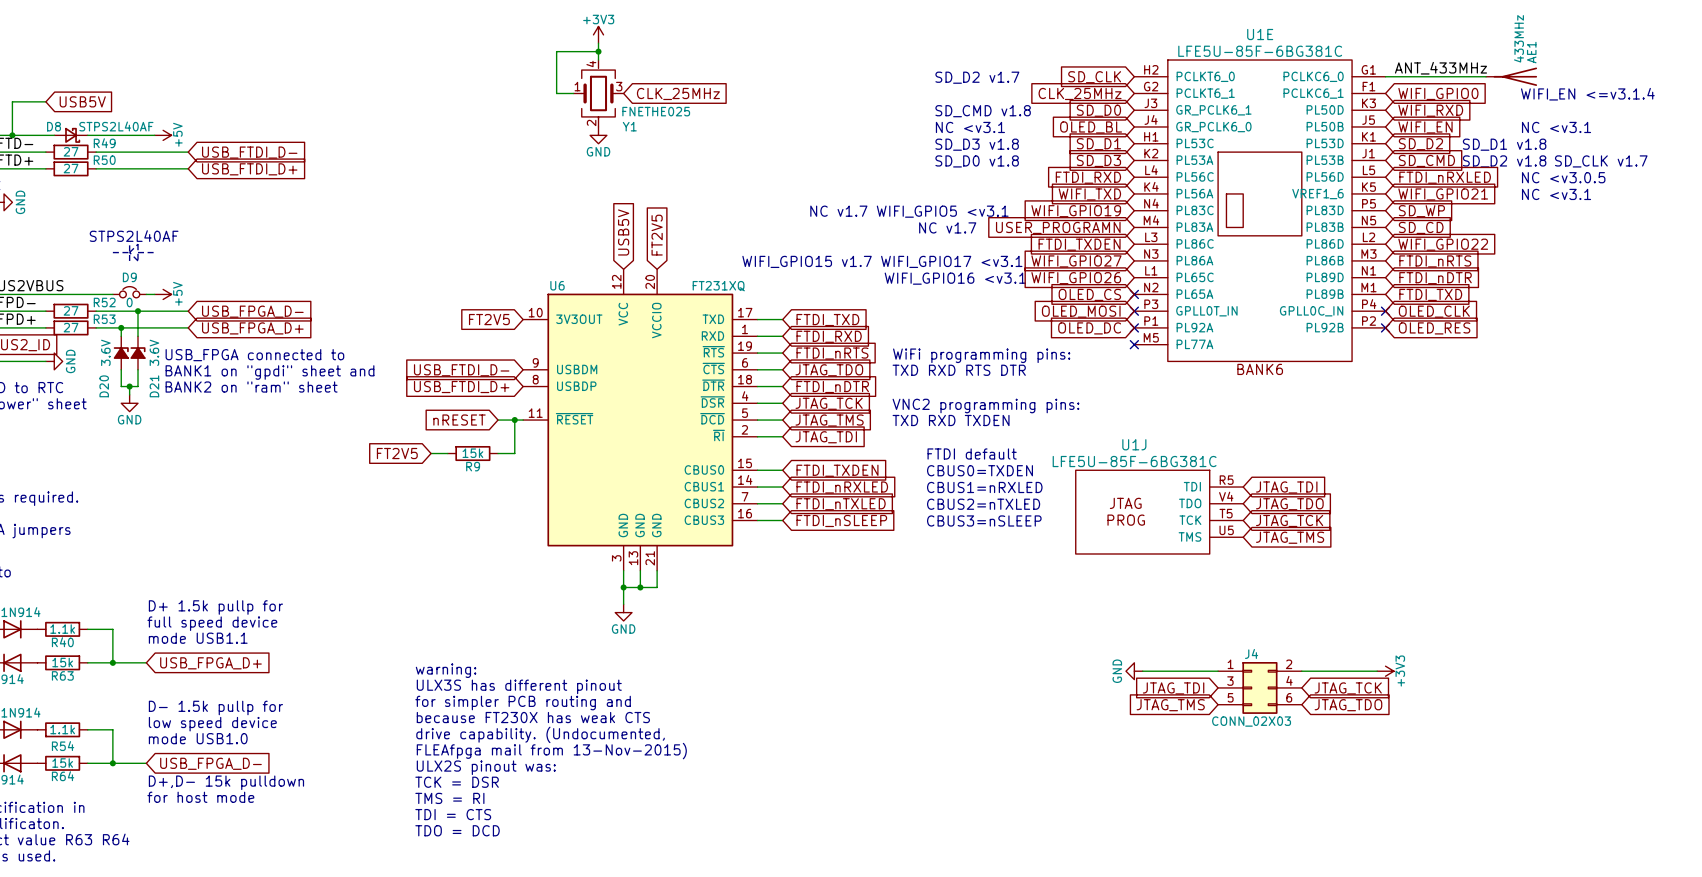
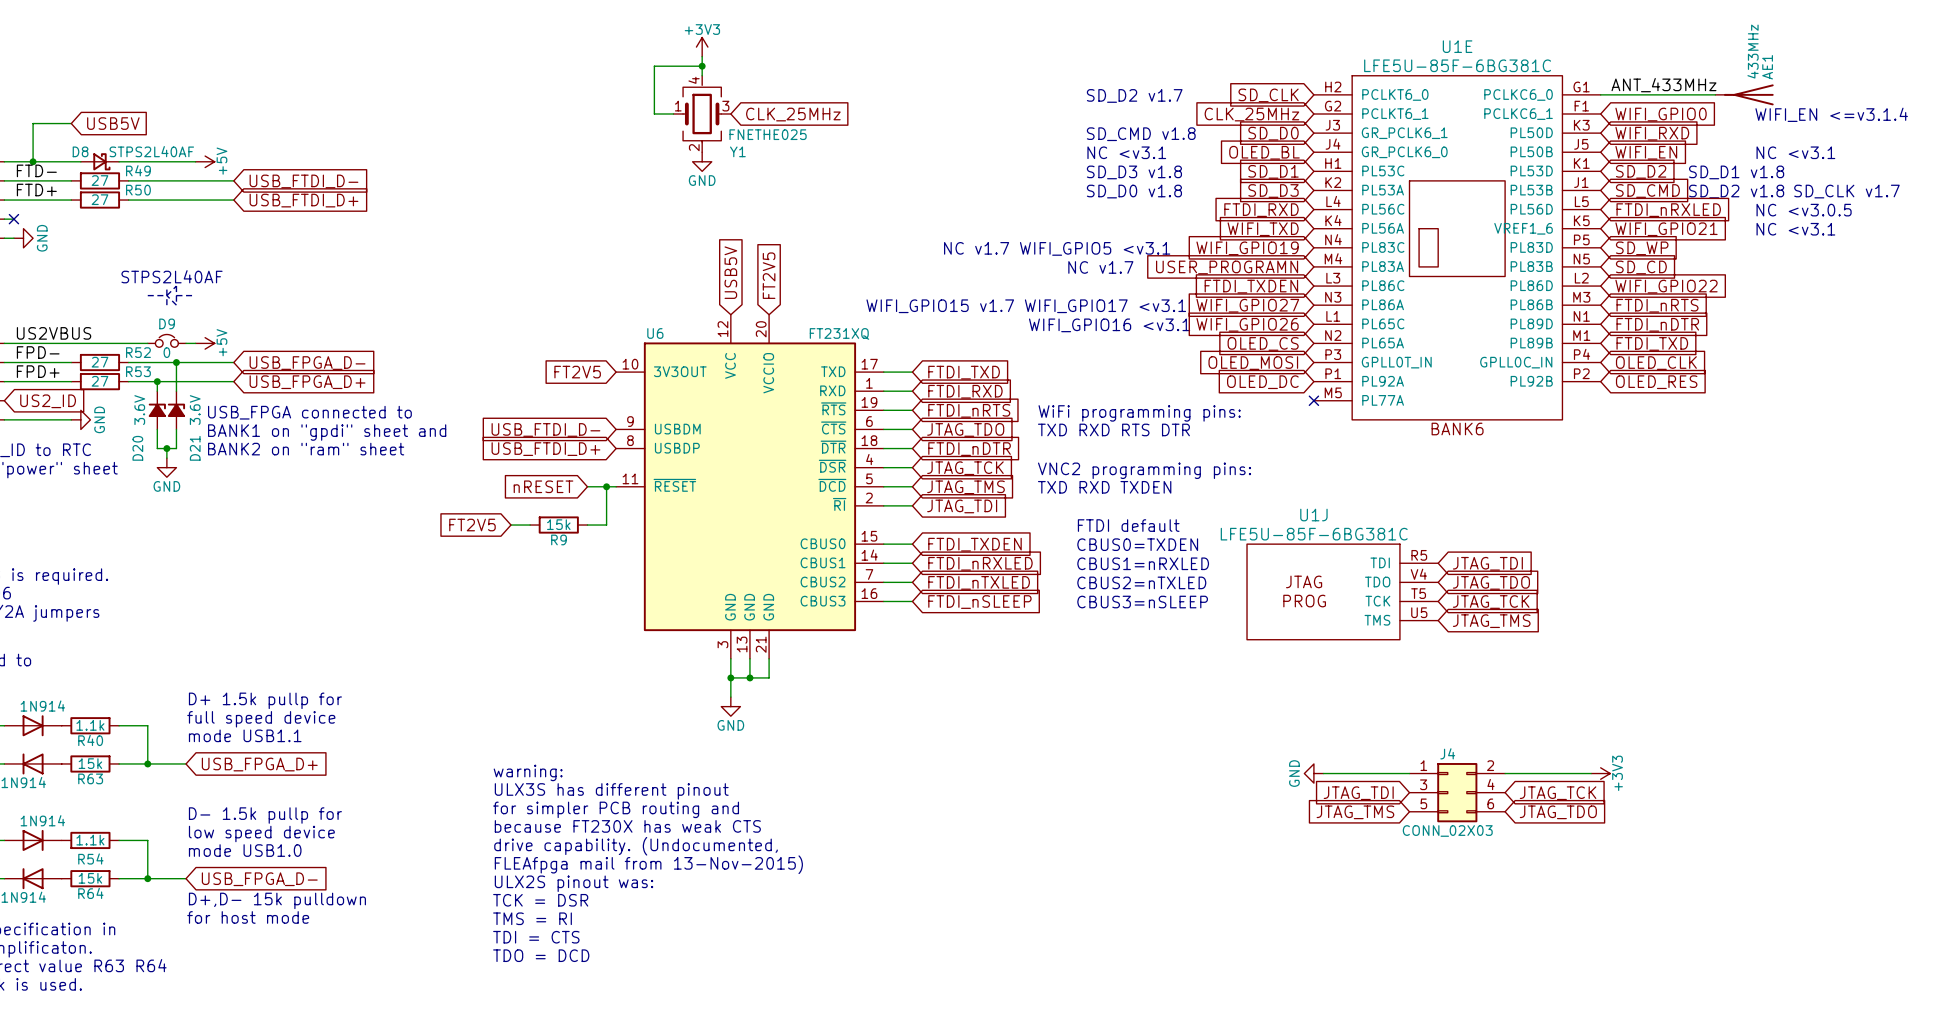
no-connect mark: (1134, 294) -> none
no-connect mark: (1134, 311) -> none
no-connect mark: (1385, 311) -> none
no-connect mark: (1134, 327) -> none
no-connect mark: (1385, 327) -> none

